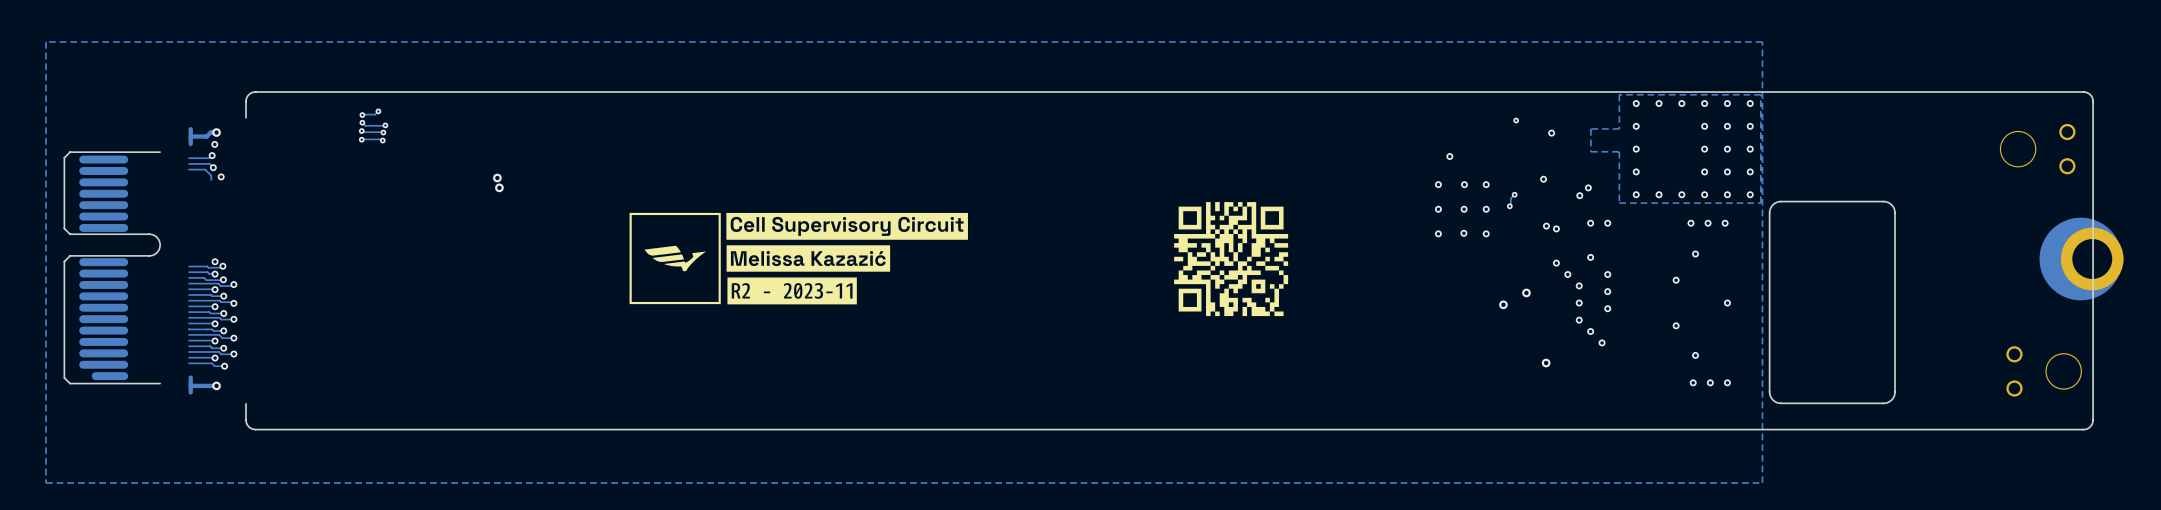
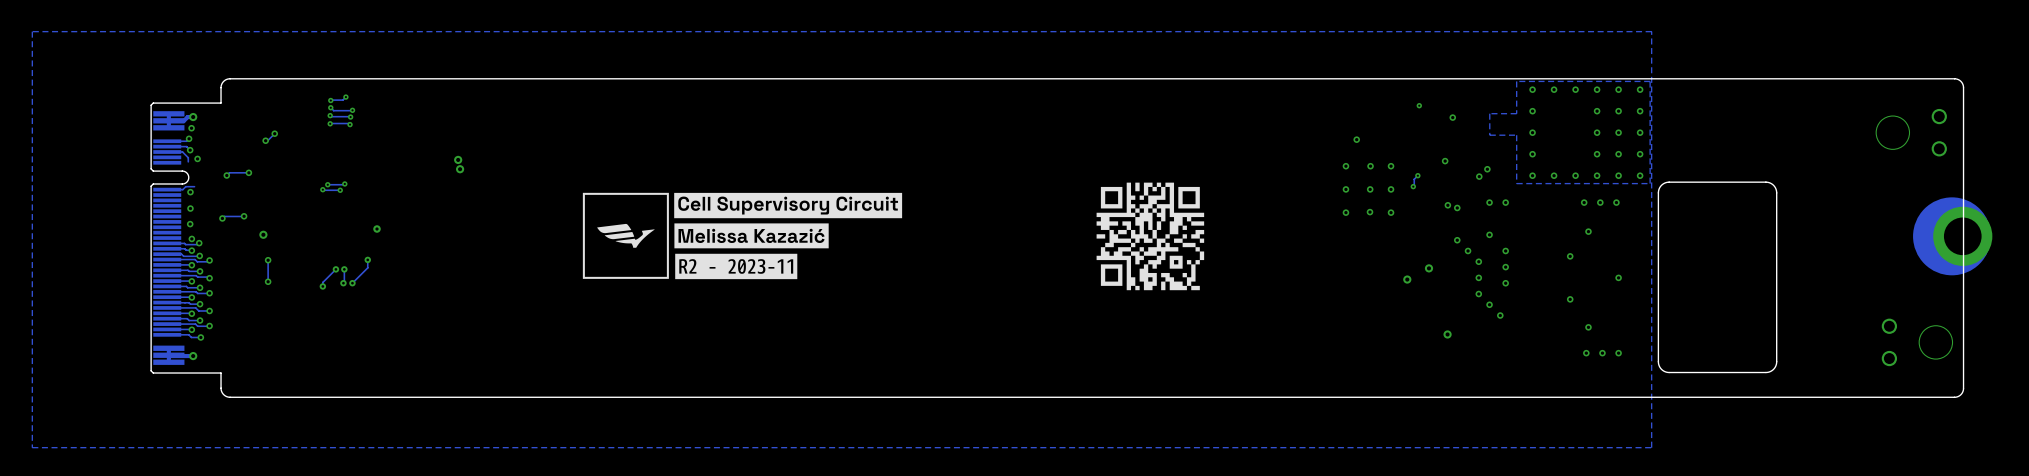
track: none -> (274, 133) (265, 140)
via: none -> (274, 133)
via: none -> (265, 140)
track: none -> (248, 172) (229, 172) (226, 175)
via: none -> (248, 172)
via: none -> (226, 175)
track: none -> (344, 183) (327, 184)
via: none -> (344, 183)
via: none -> (327, 184)
track: none -> (194, 186) (185, 186) (182, 189) (167, 189)
track: none -> (322, 189) (340, 190)
via: none -> (322, 189)
via: none -> (340, 190)
via: none -> (190, 192)
via: none -> (190, 208)
track: none -> (244, 216) (224, 216) (222, 218)
via: none -> (244, 216)
via: none -> (222, 218)
via: none -> (190, 224)
via: none -> (377, 229)
via: none -> (263, 234)
part: none -> (186, 238)
part: (112, 267) -> none
track: none -> (367, 259) (367, 267) (352, 283)
via: none -> (367, 259)
track: none -> (268, 260) (268, 281)
via: none -> (268, 260)
track: none -> (335, 269) (322, 282) (322, 286)
via: none -> (335, 269)
track: none -> (344, 269) (343, 283)
via: none -> (344, 269)
via: none -> (268, 281)
via: none -> (343, 283)
via: none -> (352, 283)
via: none -> (322, 286)

